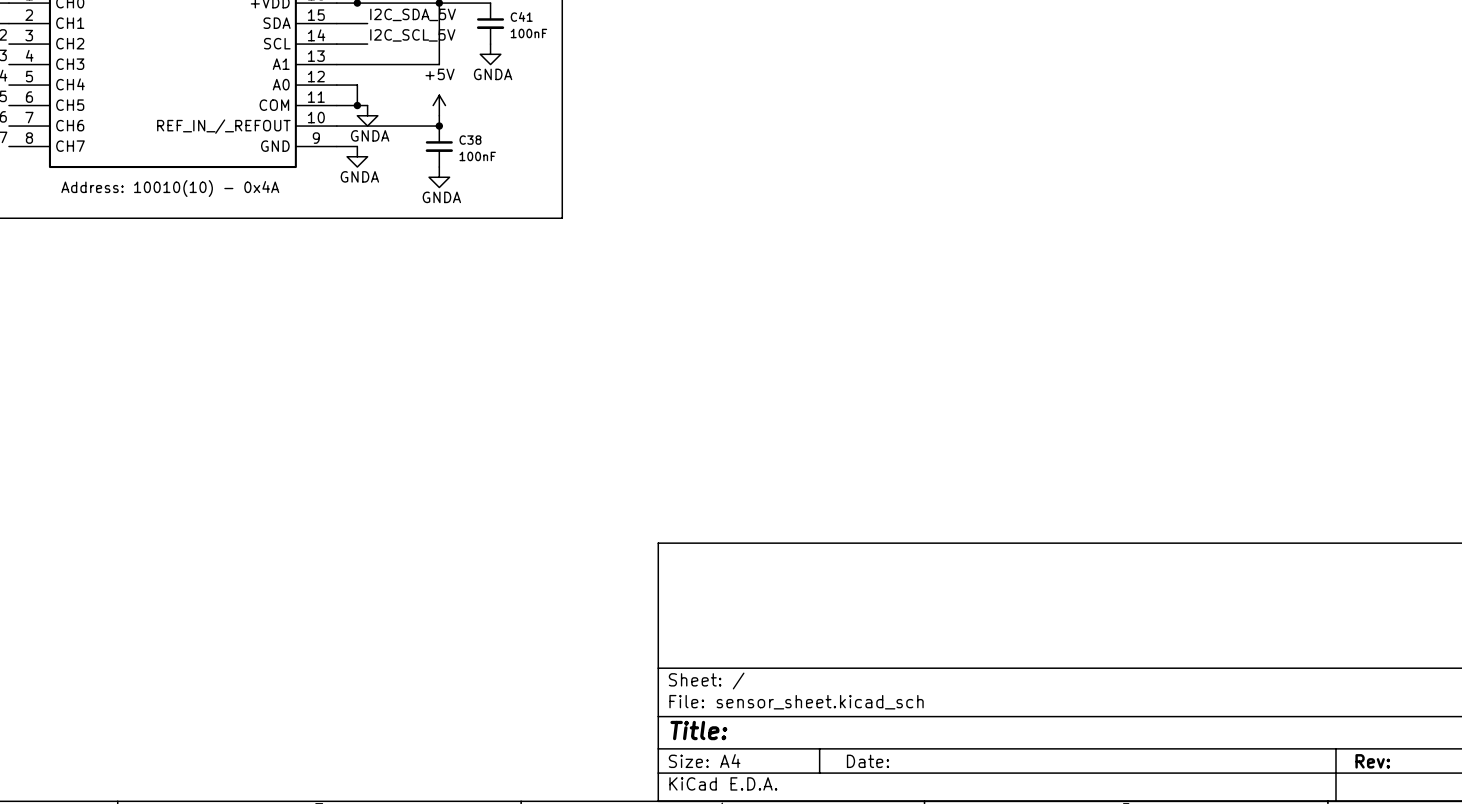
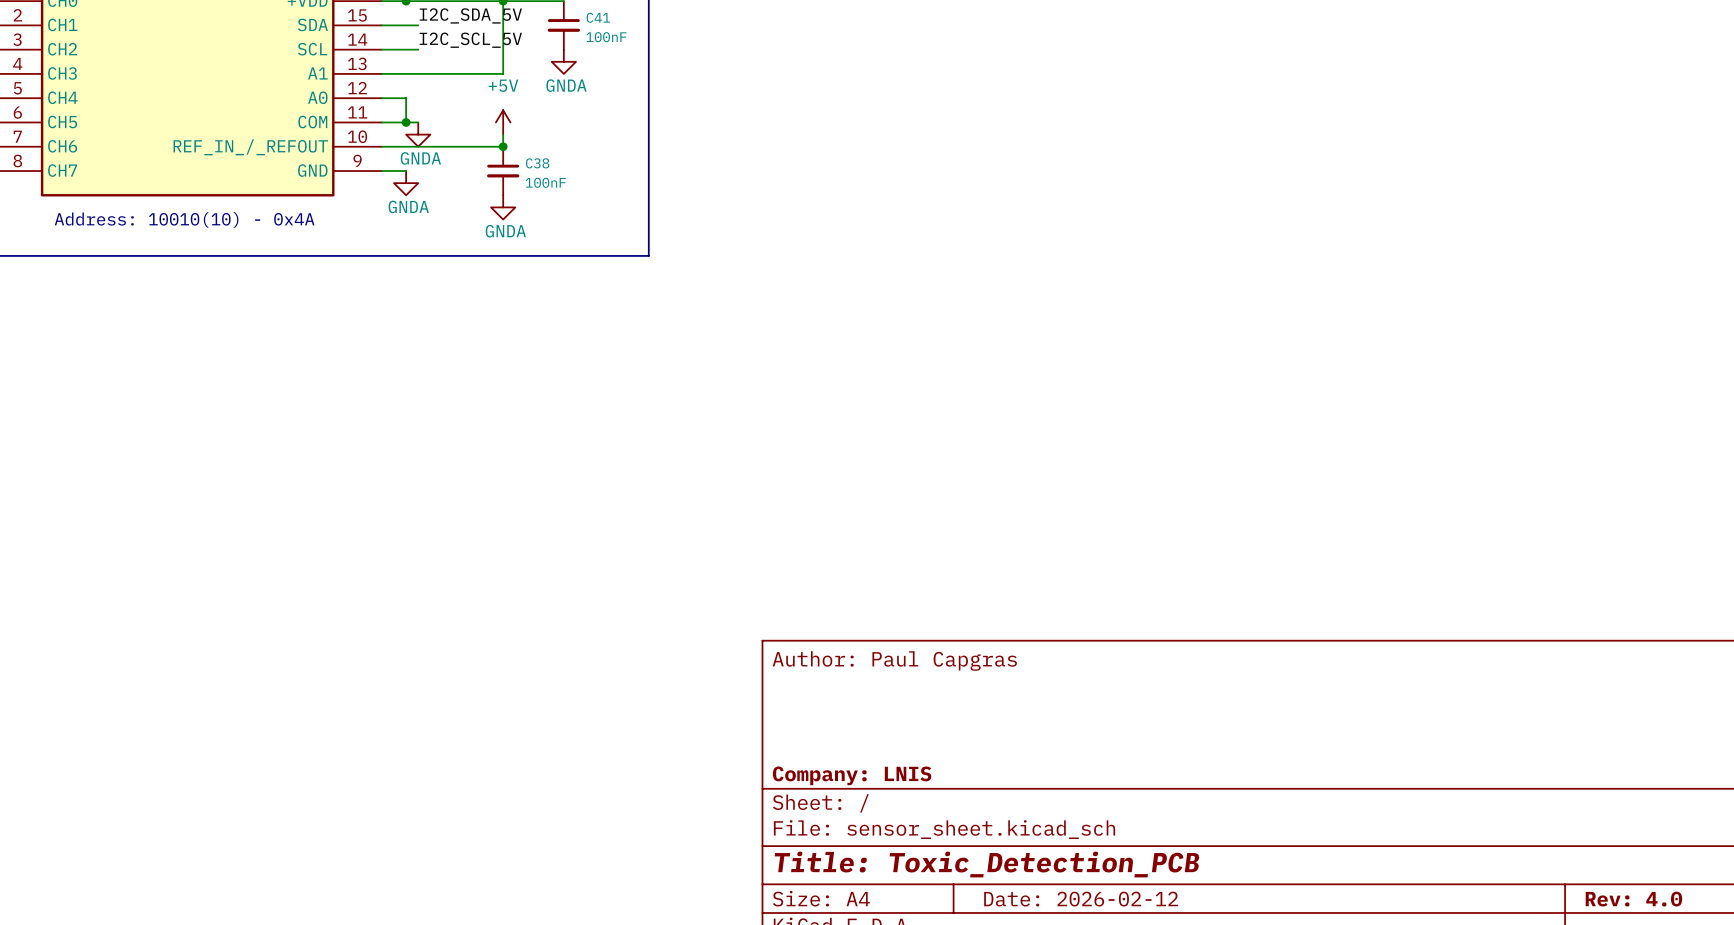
title block: none -> Author: Paul Capgras (894, 661)
title block: none -> Company: LNIS (852, 775)
title block: Title: (698, 730) -> Title: Toxic_Detection_PCB (987, 864)
title block: Date: (867, 761) -> Date: 2026-02-12 (1081, 899)
title block: Rev: (1372, 761) -> Rev: 4.0 (1633, 899)

